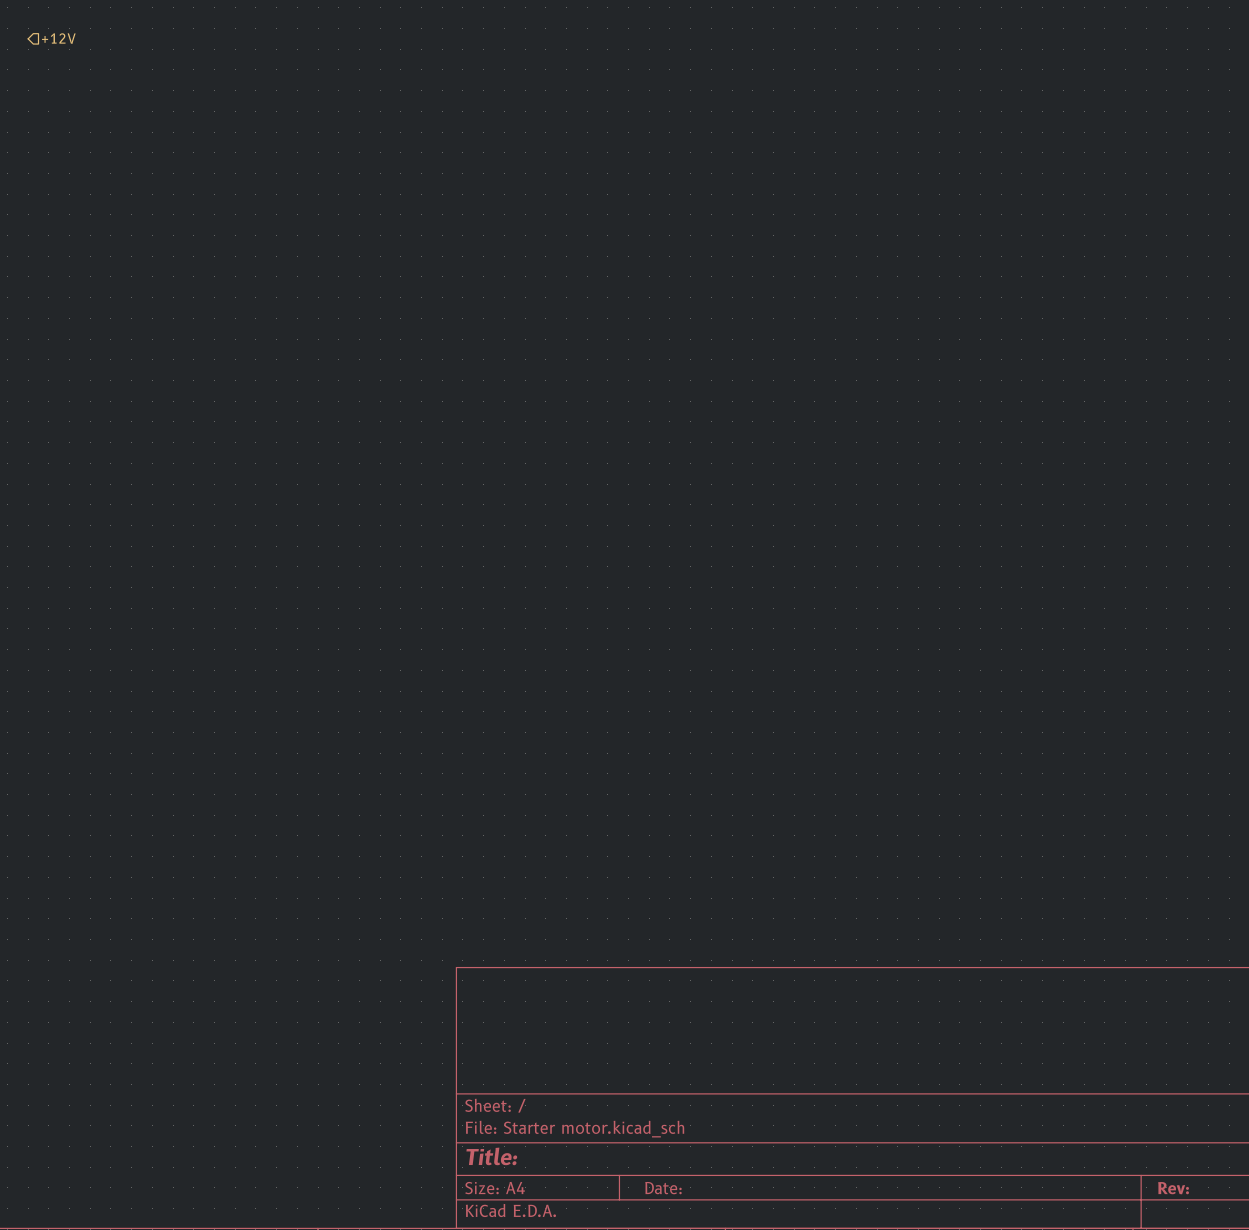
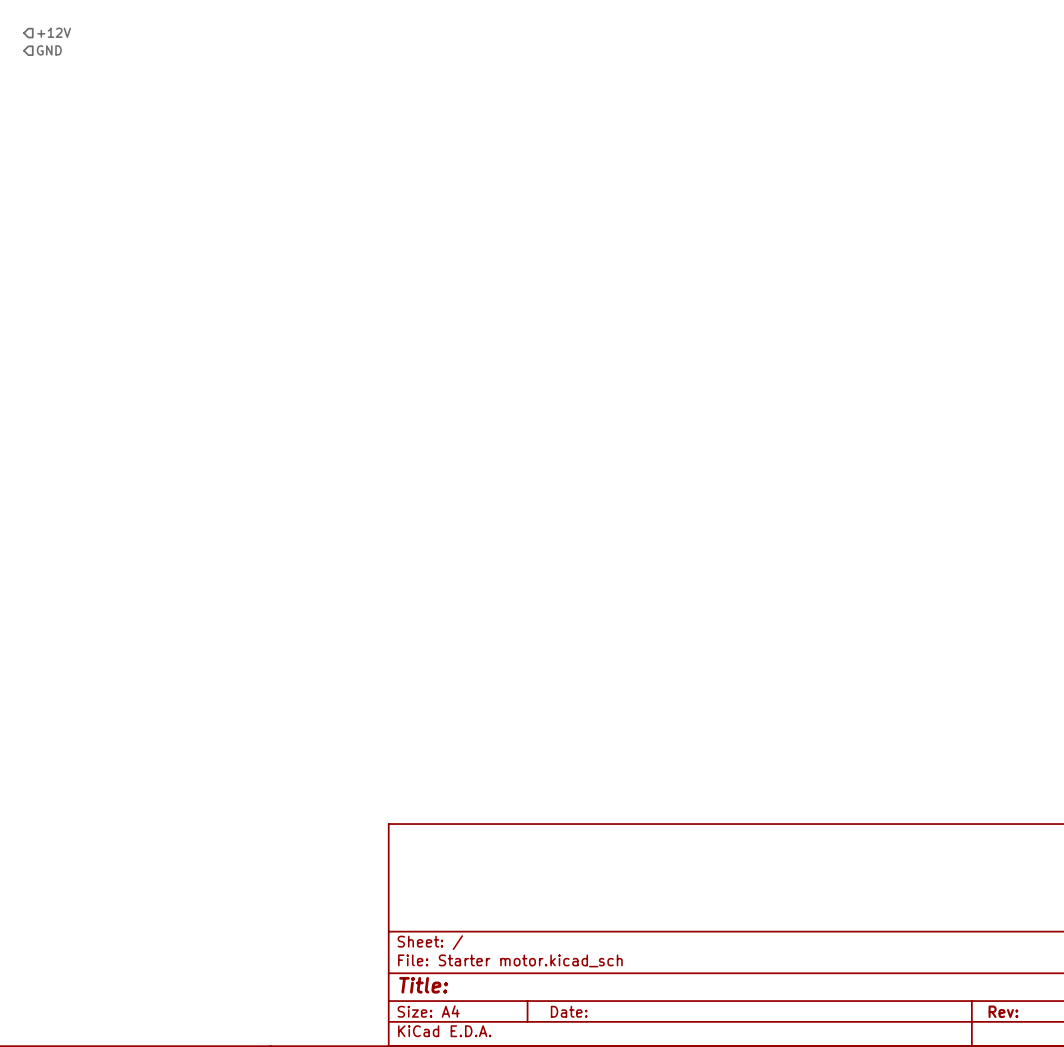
hierarchical label: none -> GND (49, 50)

